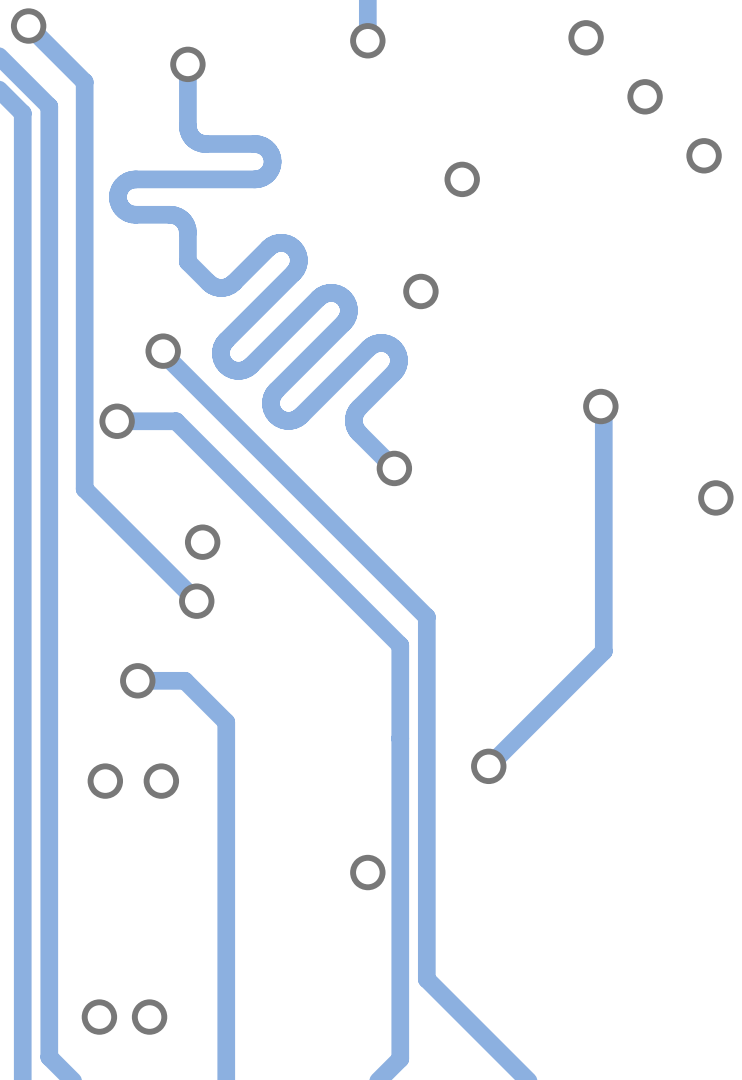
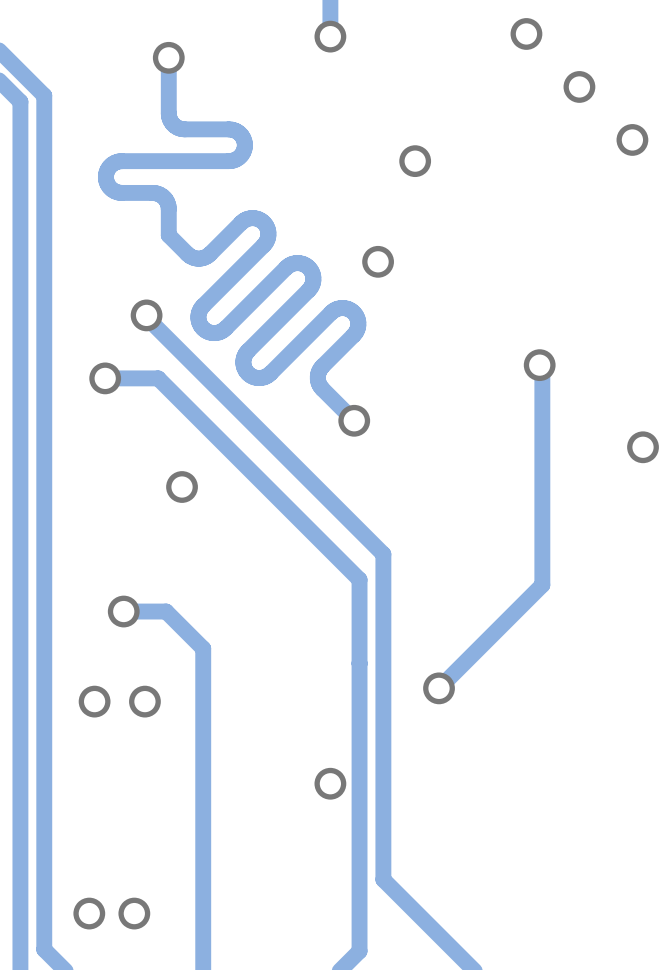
track: (28, 26) (84, 82) (84, 489) (196, 601) -> none
via: (28, 26) -> none
via: (196, 601) -> none

